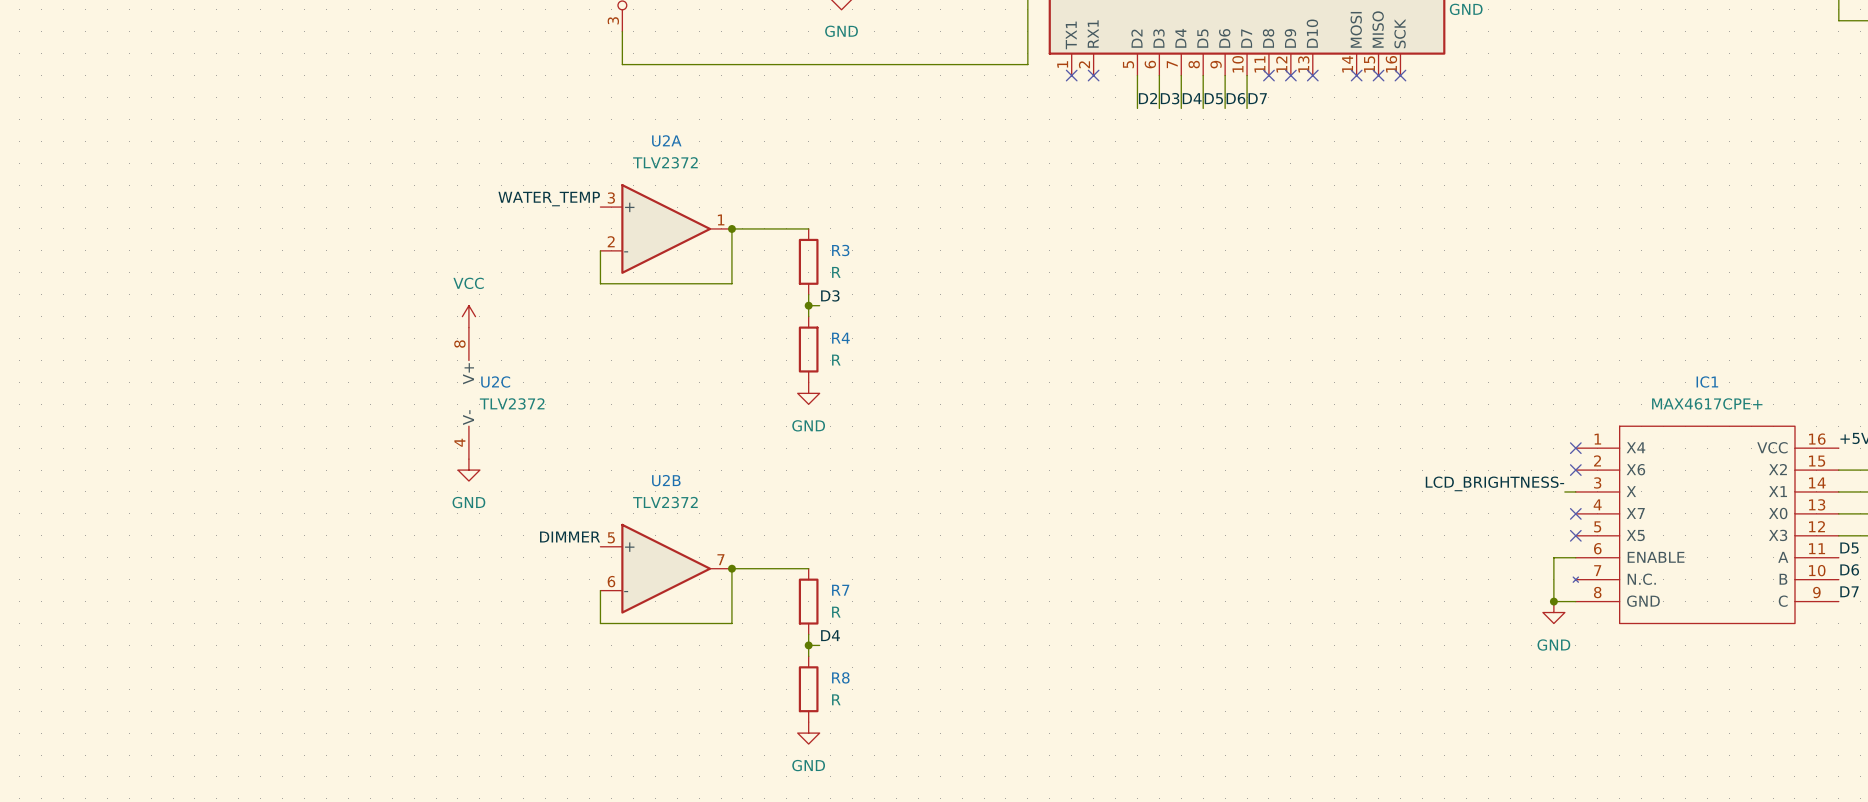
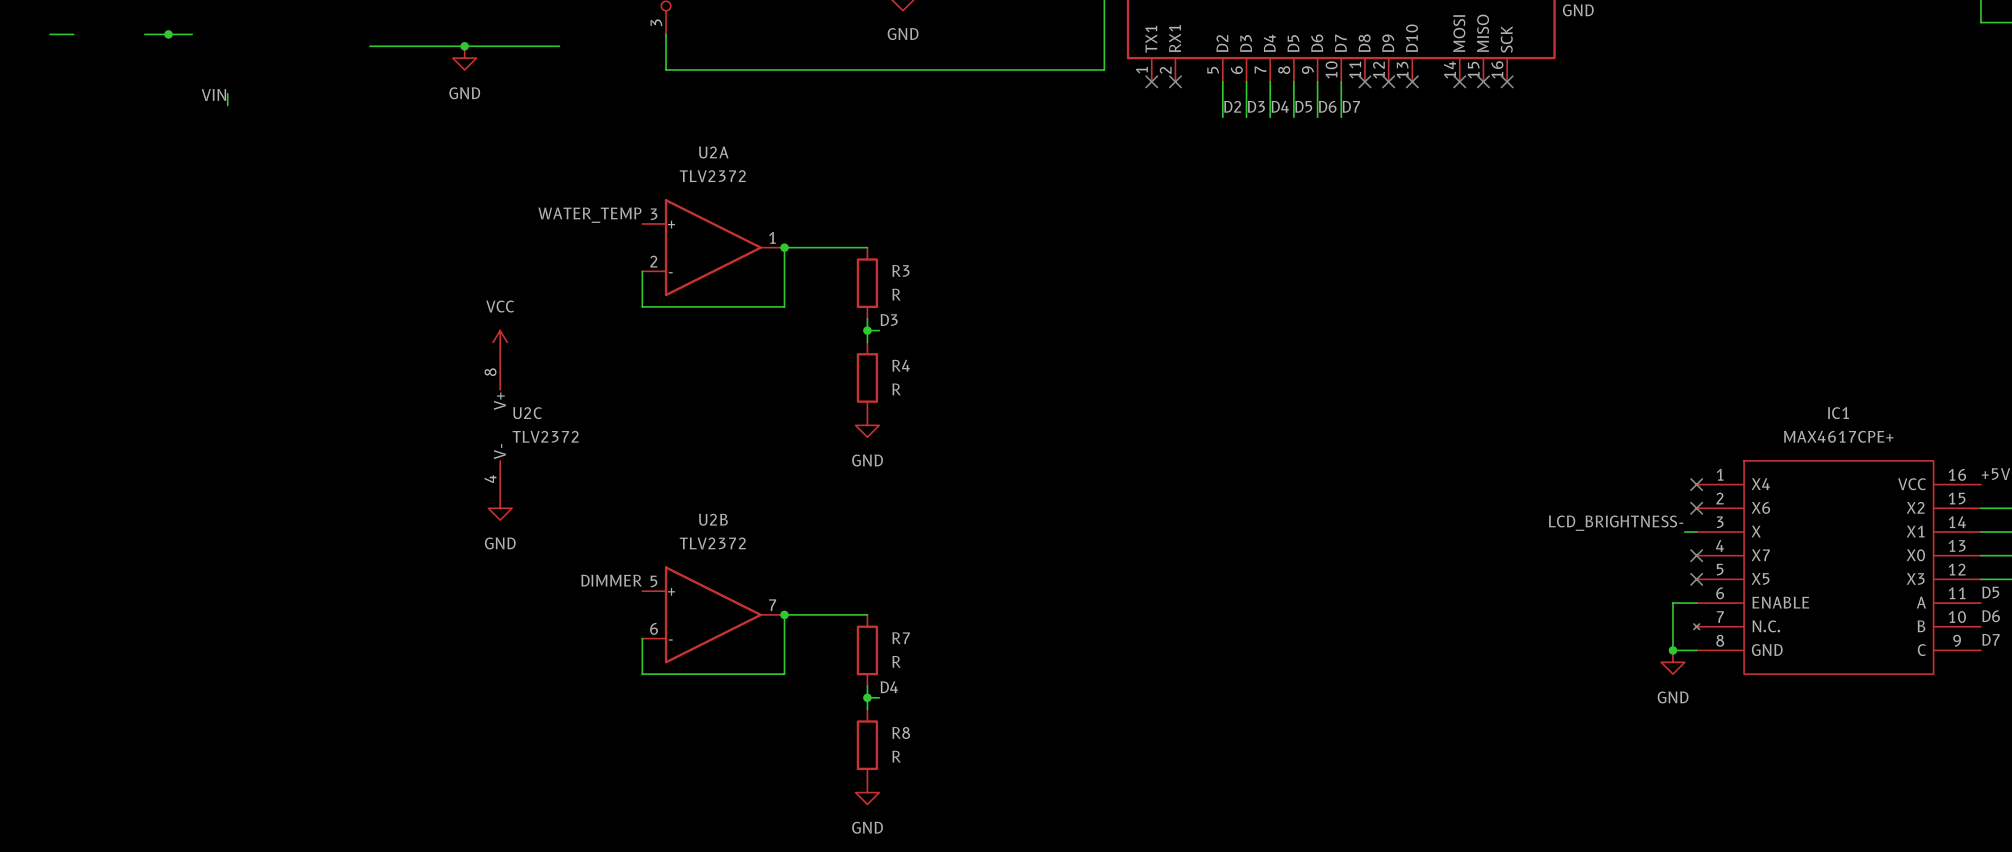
wire: none -> (50, 34) (73, 34)
wire: none -> (144, 34) (192, 34)
junction: none -> (168, 34)
wire: none -> (369, 46) (559, 46)
junction: none -> (464, 46)
power symbol: none -> GND (464, 58)
wire: none -> (227, 93) (227, 105)
label: none -> VIN (213, 95)

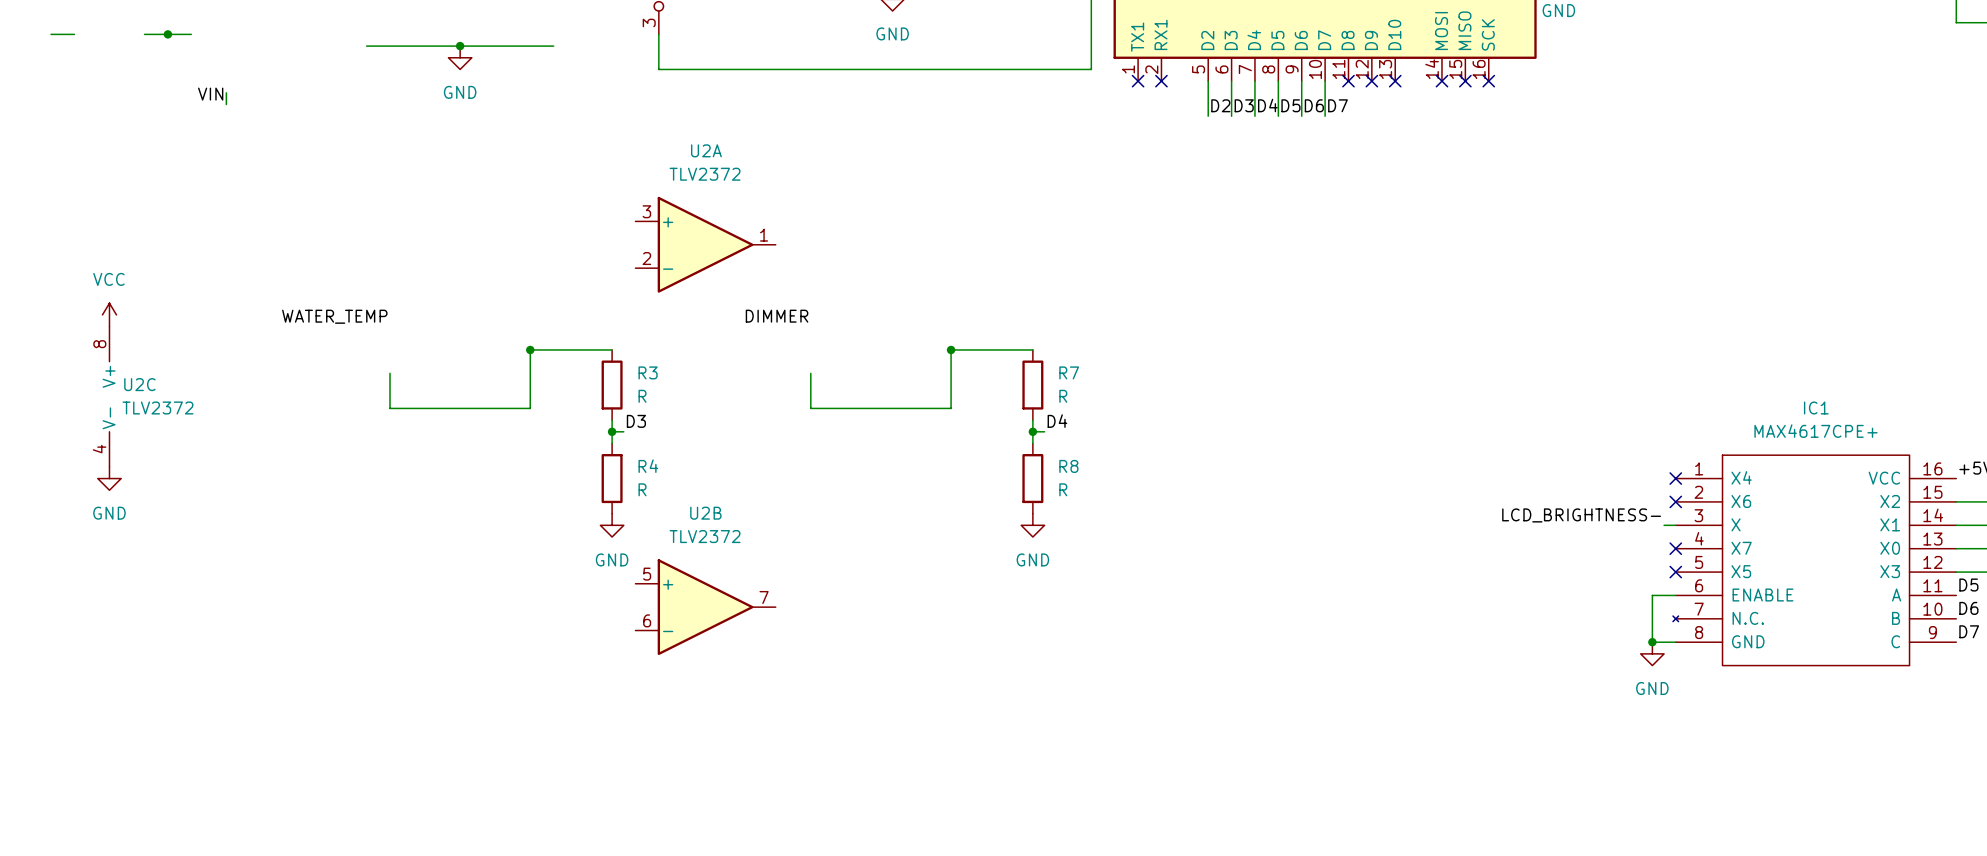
label: WATER_TEMP (589, 215) -> none
junction: (784, 247) -> none
wire: (867, 247) (784, 247) (784, 306) (642, 306) (642, 271) -> (1032, 349) (951, 349) (951, 408) (810, 408) (810, 373)
R3 position: (867, 283) -> (612, 385)
power symbol: none -> VCC (109, 314)
wire: (867, 318) (867, 342) -> (1032, 420) (1032, 443)
label: none -> DIMMER (777, 316)
label: D3 (889, 320) -> none
label: none -> WATER_TEMP (334, 316)
wire: (867, 330) (879, 330) -> (1032, 431) (1044, 431)
junction: (867, 330) -> none
power symbol: VCC (500, 342) -> none
junction: none -> (530, 349)
wire: none -> (612, 349) (530, 349) (530, 408) (390, 408) (390, 373)
junction: none -> (951, 349)
R4 position: (867, 377) -> (612, 478)
U2C position: (500, 425) -> (109, 396)
wire: none -> (612, 420) (612, 443)
power symbol: GND (867, 425) -> none
label: none -> D3 (636, 421)
label: none -> D4 (1057, 421)
wire: none -> (612, 431) (623, 431)
junction: none -> (612, 431)
junction: none -> (1032, 431)
power symbol: none -> GND (109, 478)
power symbol position: GND (500, 508) -> GND (612, 525)
power symbol: none -> GND (1032, 525)
label: DIMMER (611, 580) -> none
junction: (784, 614) -> none
wire: (867, 614) (784, 614) (784, 674) (642, 674) (642, 638) -> none
R7 position: (867, 650) -> (1032, 385)
wire: (867, 685) (867, 709) -> none
label: D4 (889, 687) -> none
wire: (867, 697) (879, 697) -> none
junction: (867, 697) -> none
R8 position: (867, 745) -> (1032, 478)
power symbol: GND (867, 792) -> none

